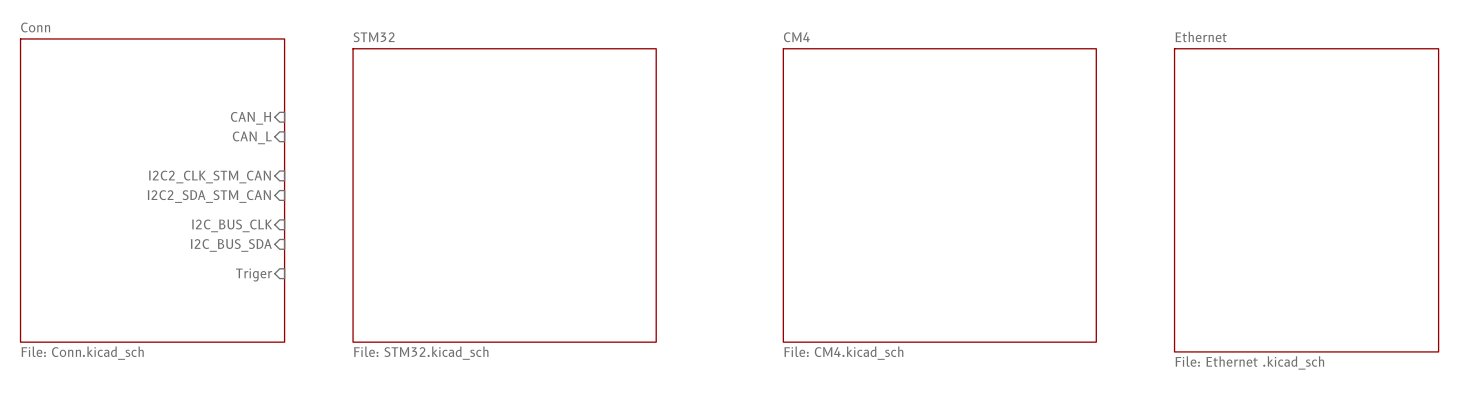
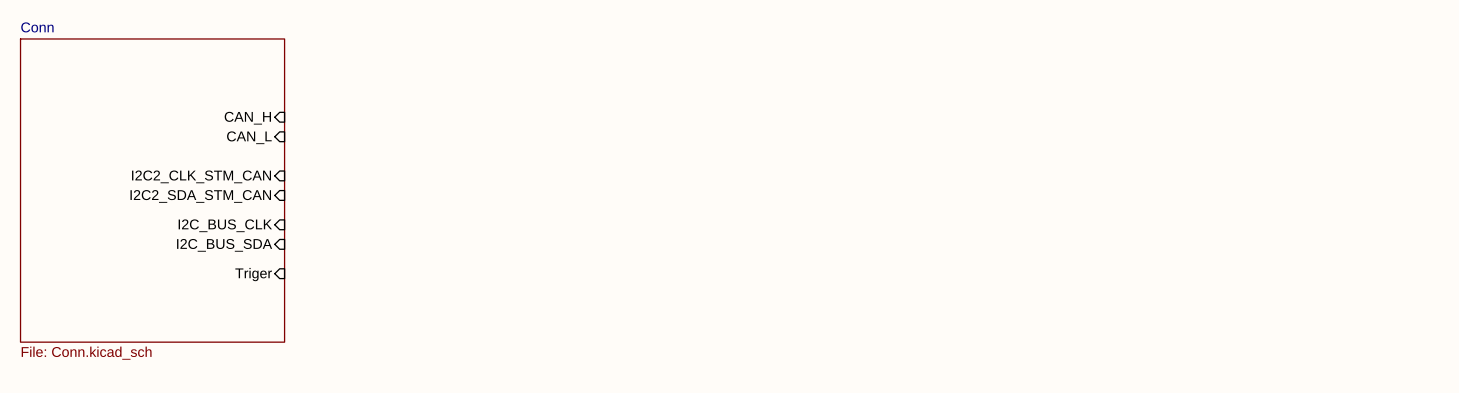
sheet STM32: File: STM32.kicad_sch (504, 195) -> none
sheet CM4: File: CM4.kicad_sch (939, 195) -> none
sheet Ethernet: File: Ethernet .kicad_sch (1306, 200) -> none

